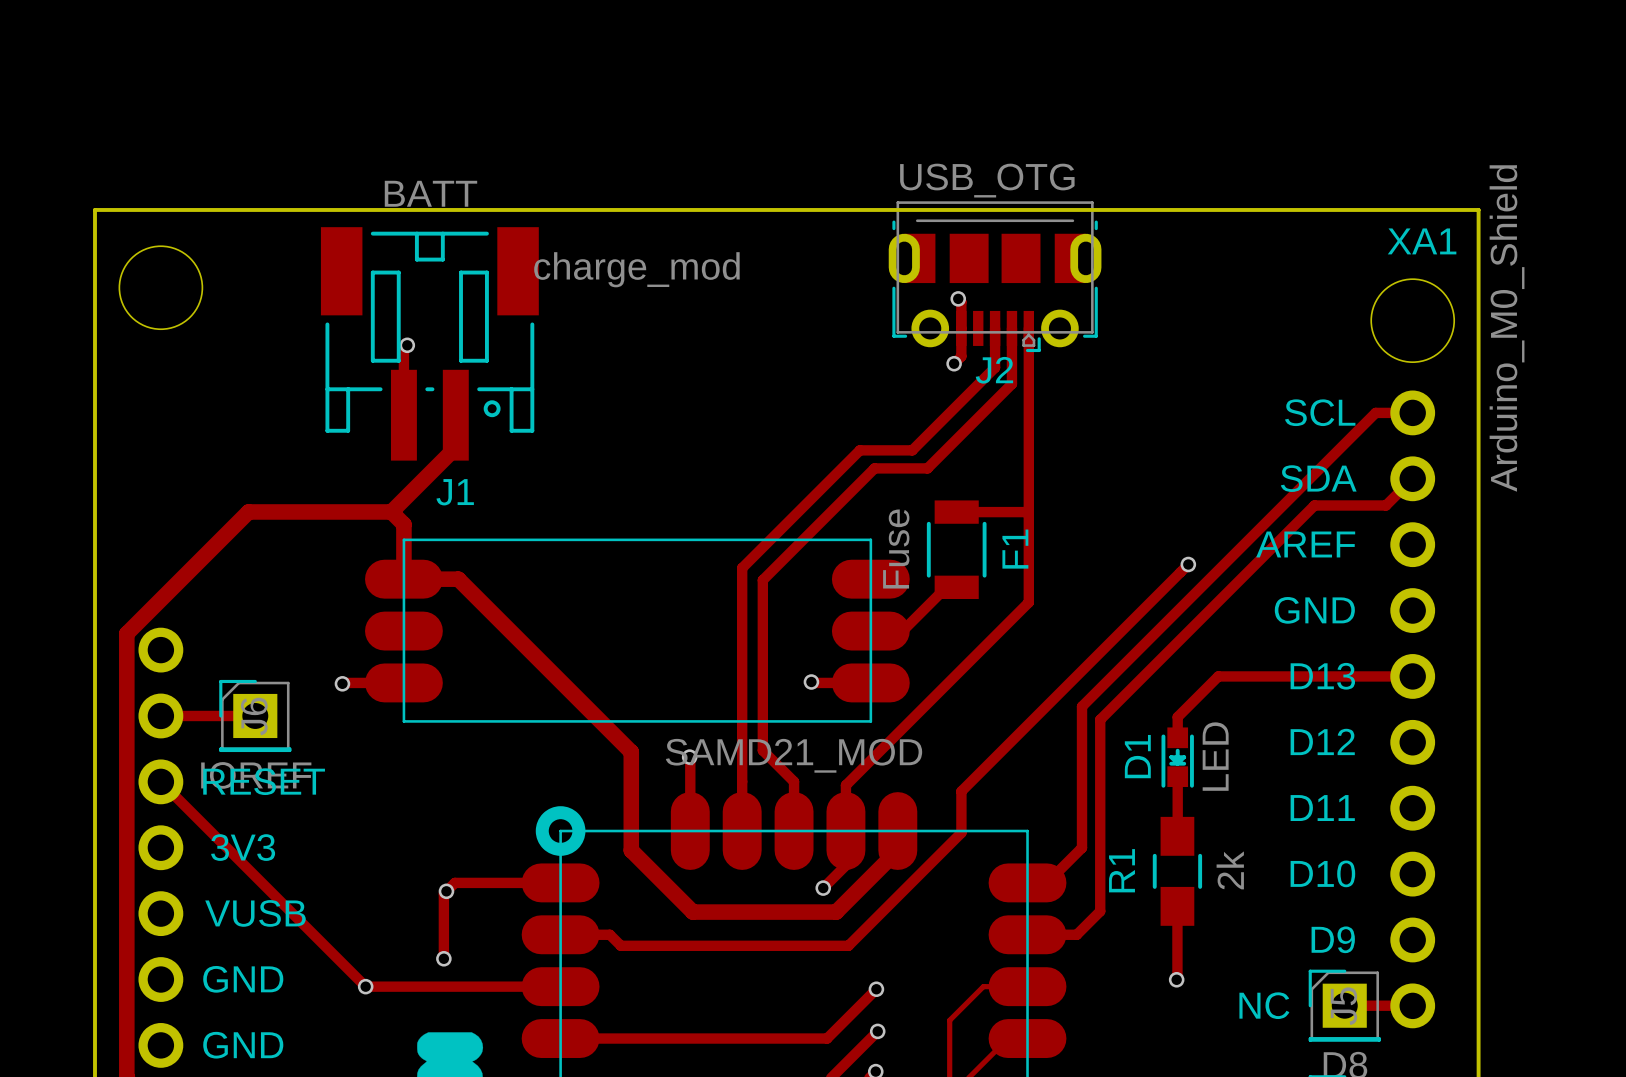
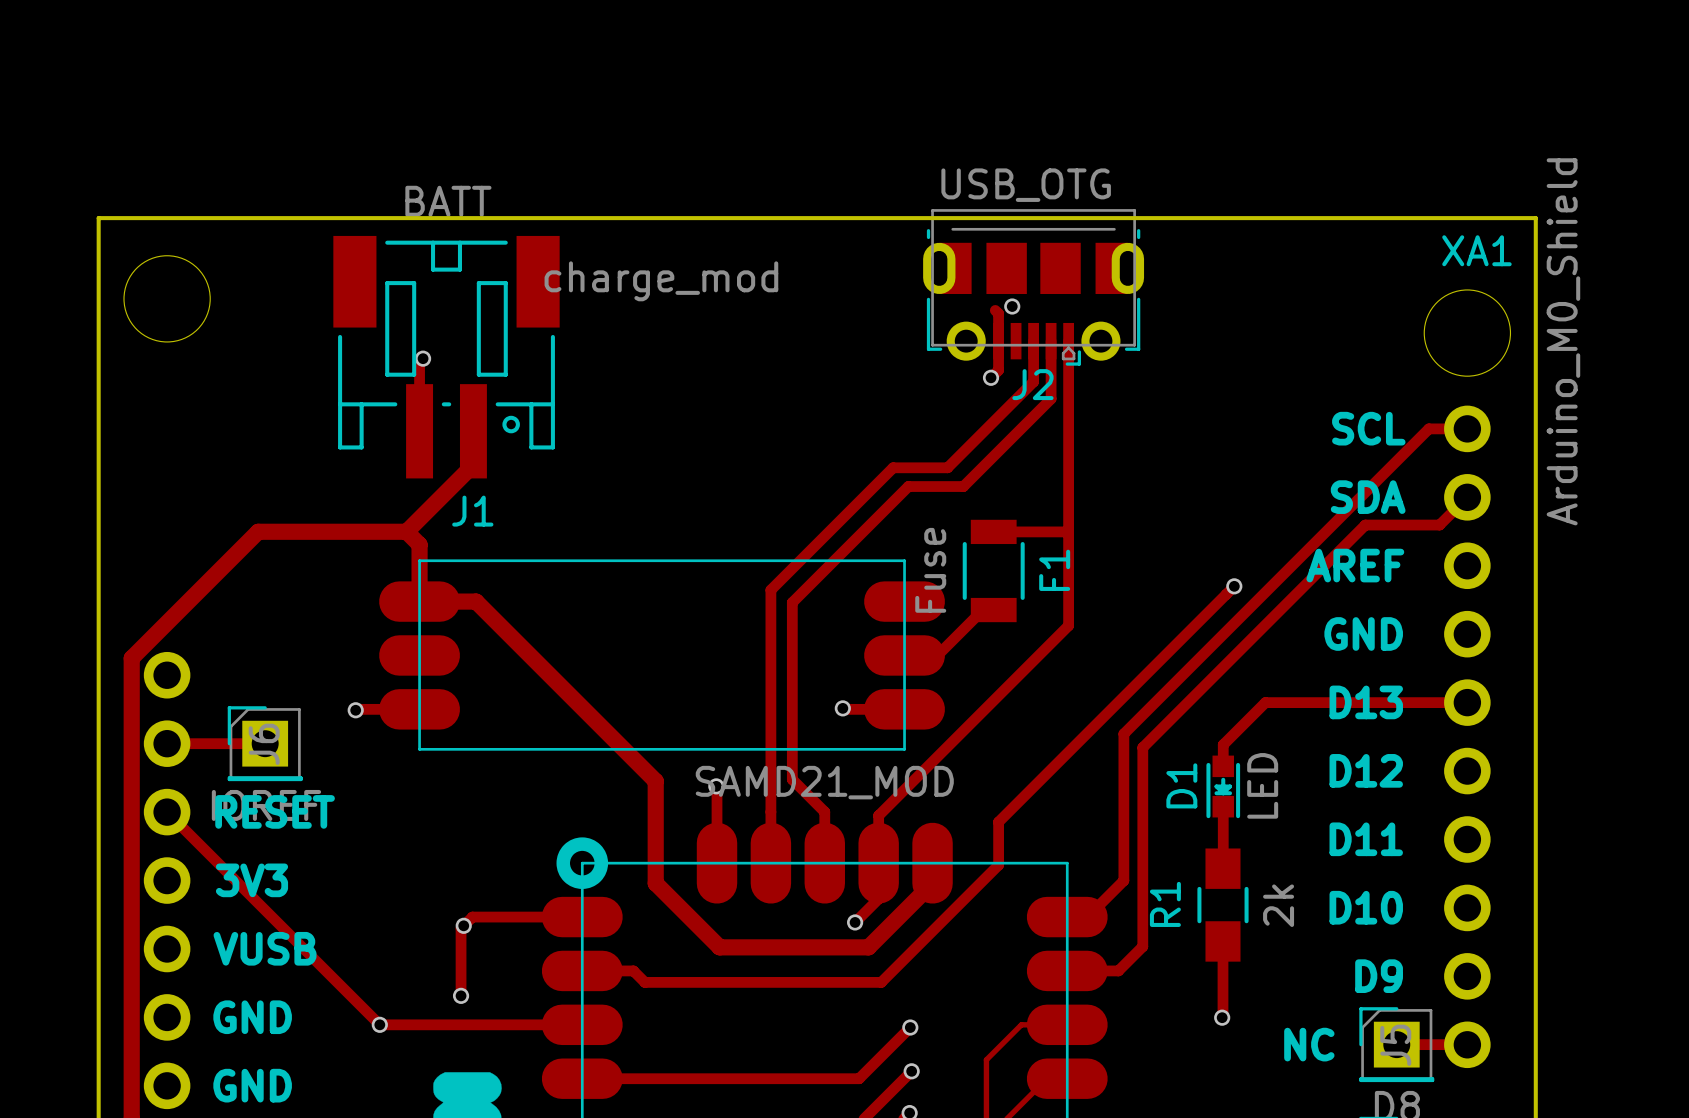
via position: (958, 298) -> (1012, 306)

